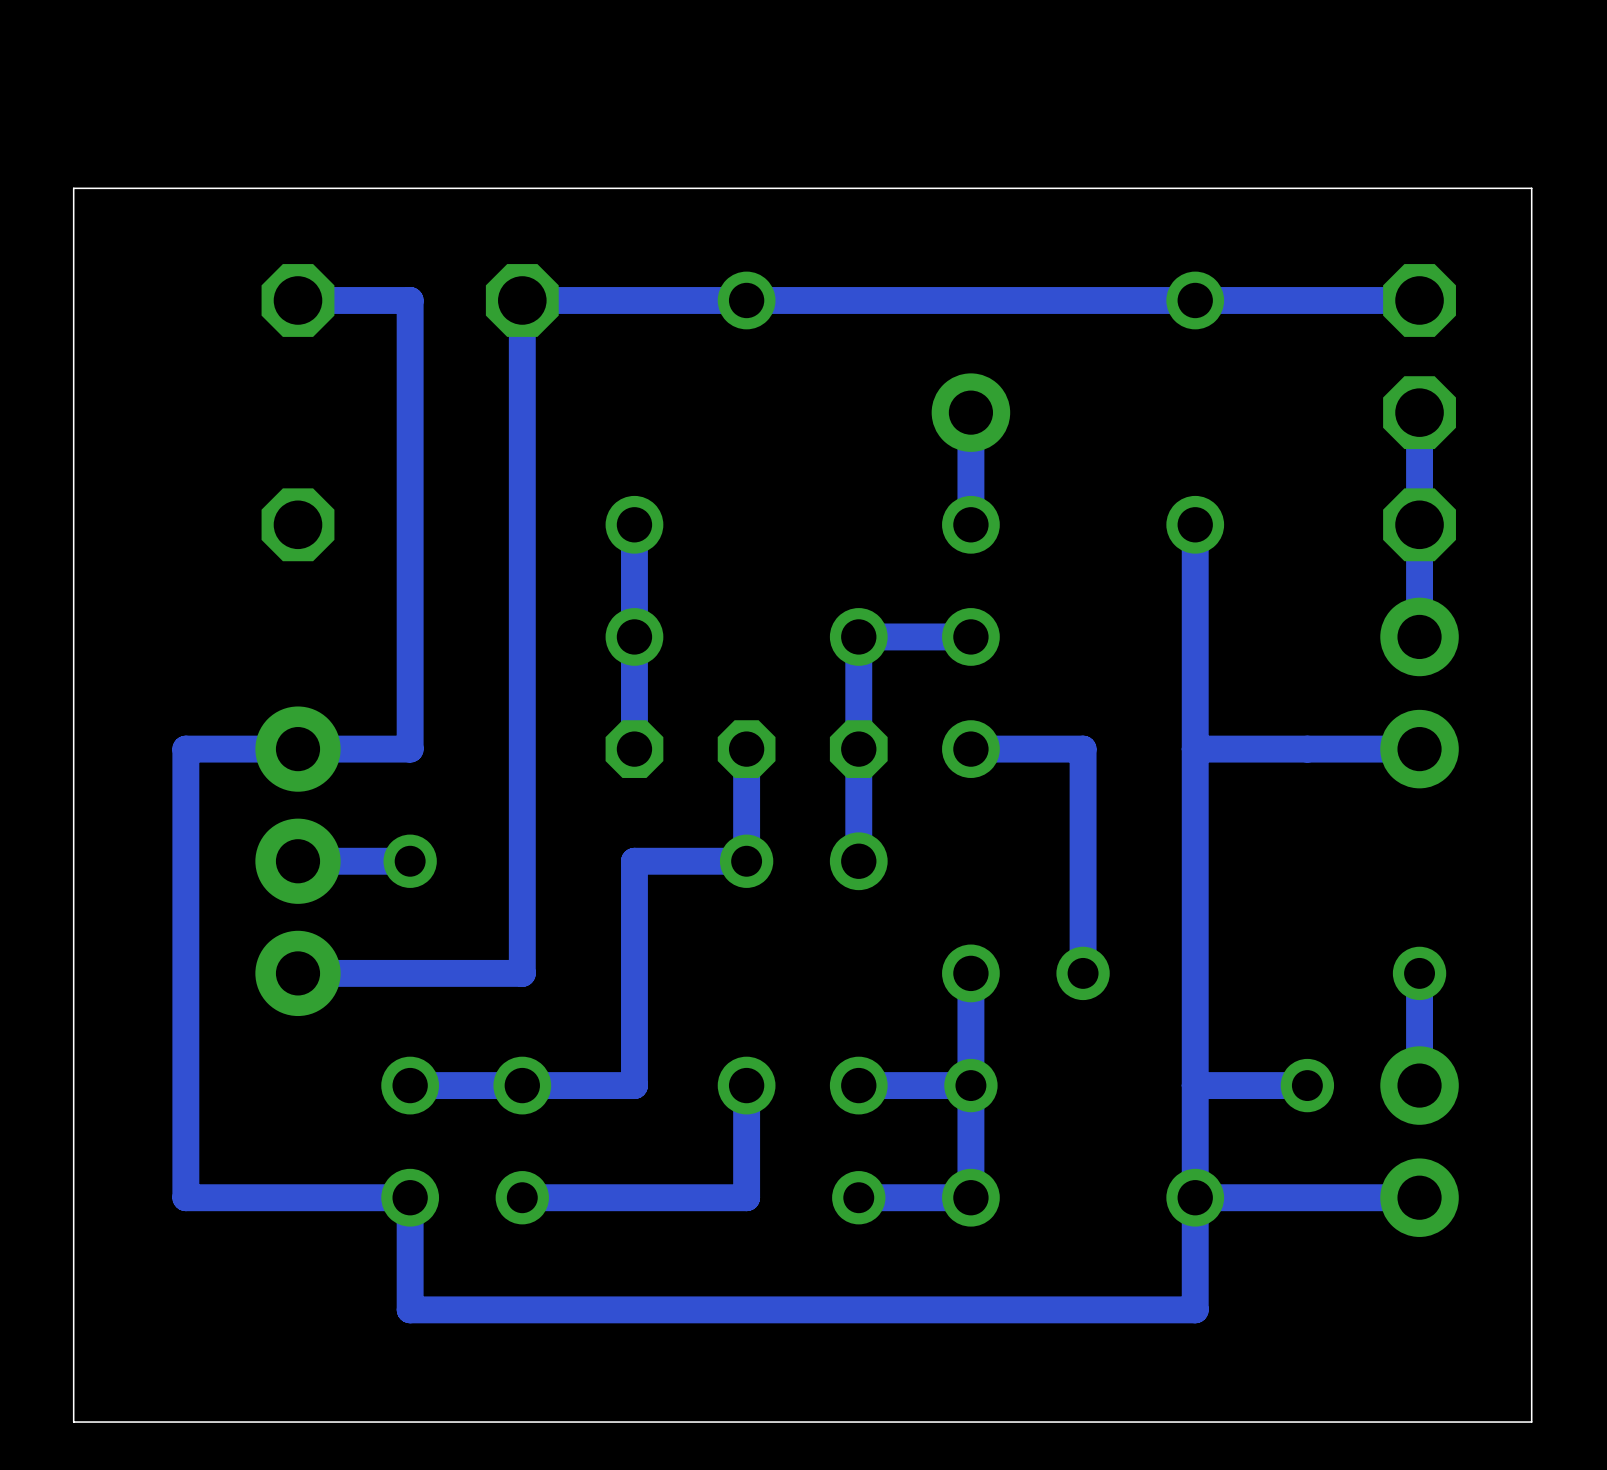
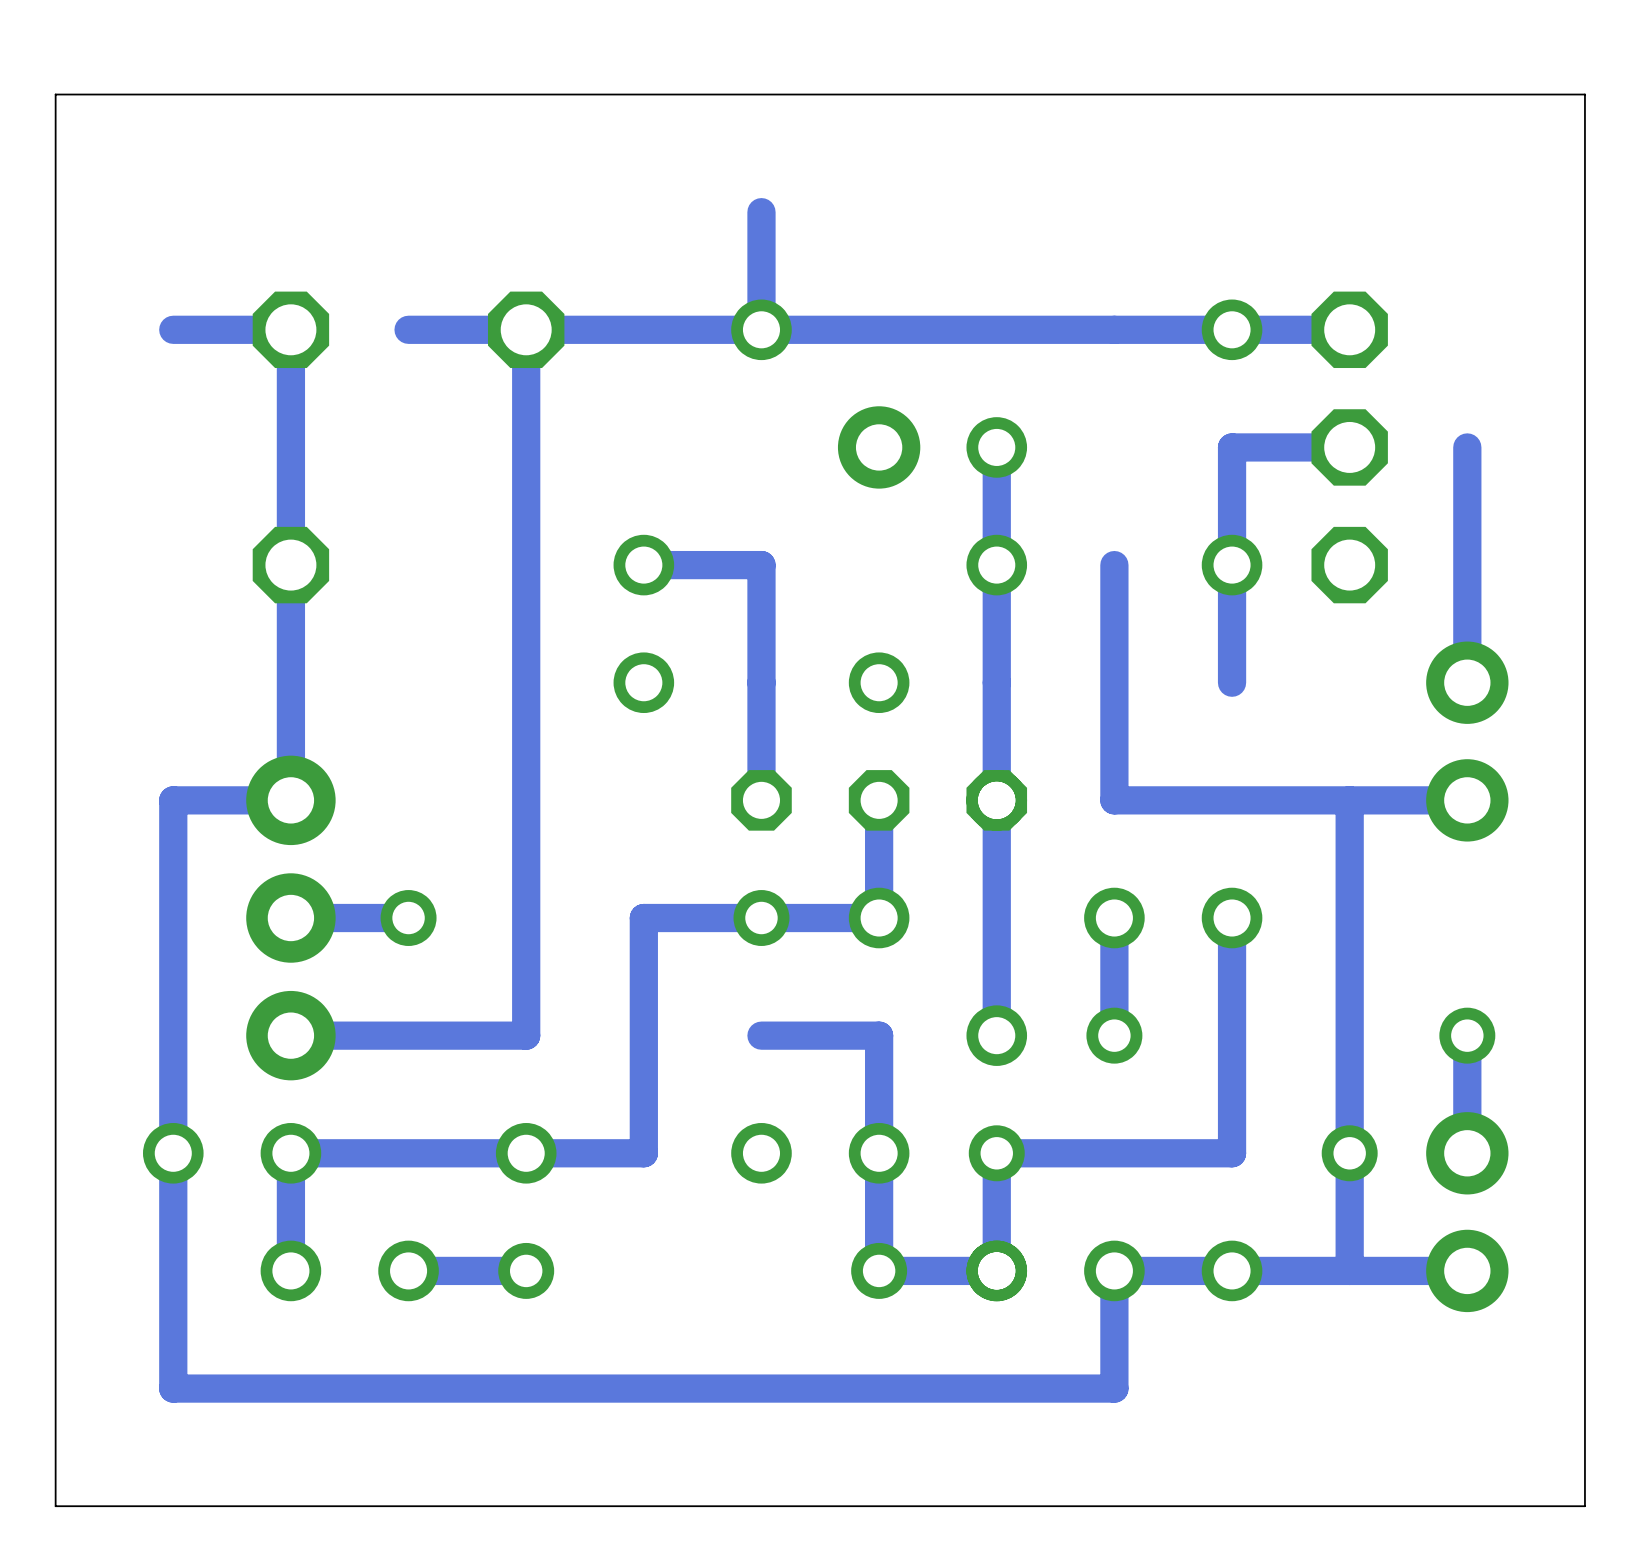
track: none -> (761, 212) (761, 329)
board edge: (1531, 188) (73, 188) -> (1584, 212) (1584, 94) (55, 94) (55, 212)
track: (298, 300) (410, 300) (410, 749) (298, 749) -> (173, 329) (290, 329) (290, 800)
track: (1419, 300) (1307, 300) -> (526, 329) (408, 329)
part position: (970, 412) -> (879, 447)
part position: (1419, 412) -> (1349, 447)
track: (634, 524) (634, 749) -> (643, 565) (761, 565) (761, 800)
track: none -> (1114, 565) (1114, 800) (1232, 800)
part position: (970, 580) -> (996, 506)
track: (970, 636) (858, 636) (858, 749) -> (1349, 447) (1232, 447) (1232, 565)
track: (1195, 636) (1195, 861) -> none
track: (746, 749) (746, 861) -> (879, 918) (761, 918)
part position: (746, 749) -> (879, 800)
track: (970, 749) (1083, 749) (1083, 861) -> none
track: none -> (1349, 800) (1349, 1270)
part: none -> (1173, 918)
track: none -> (761, 1035) (879, 1035) (879, 1270)
track: (970, 973) (970, 1085) (858, 1085) -> (996, 1035) (996, 565)
part: none -> (232, 1153)
track: none -> (408, 1153) (290, 1153) (290, 1270)
track: (746, 1085) (746, 1197) (522, 1197) -> (408, 1270) (526, 1270)
track: none -> (1232, 1153) (996, 1153)
track: (1307, 1085) (1195, 1085) (1195, 1309) (1083, 1309) -> (1232, 1270) (1114, 1270) (1114, 1388)
part rotation: 0° (410, 1141) -> 90° clockwise (349, 1270)
track: (185, 1197) (410, 1197) (410, 1309) -> (173, 1270) (173, 1388) (408, 1388)
part: none -> (1055, 1270)

